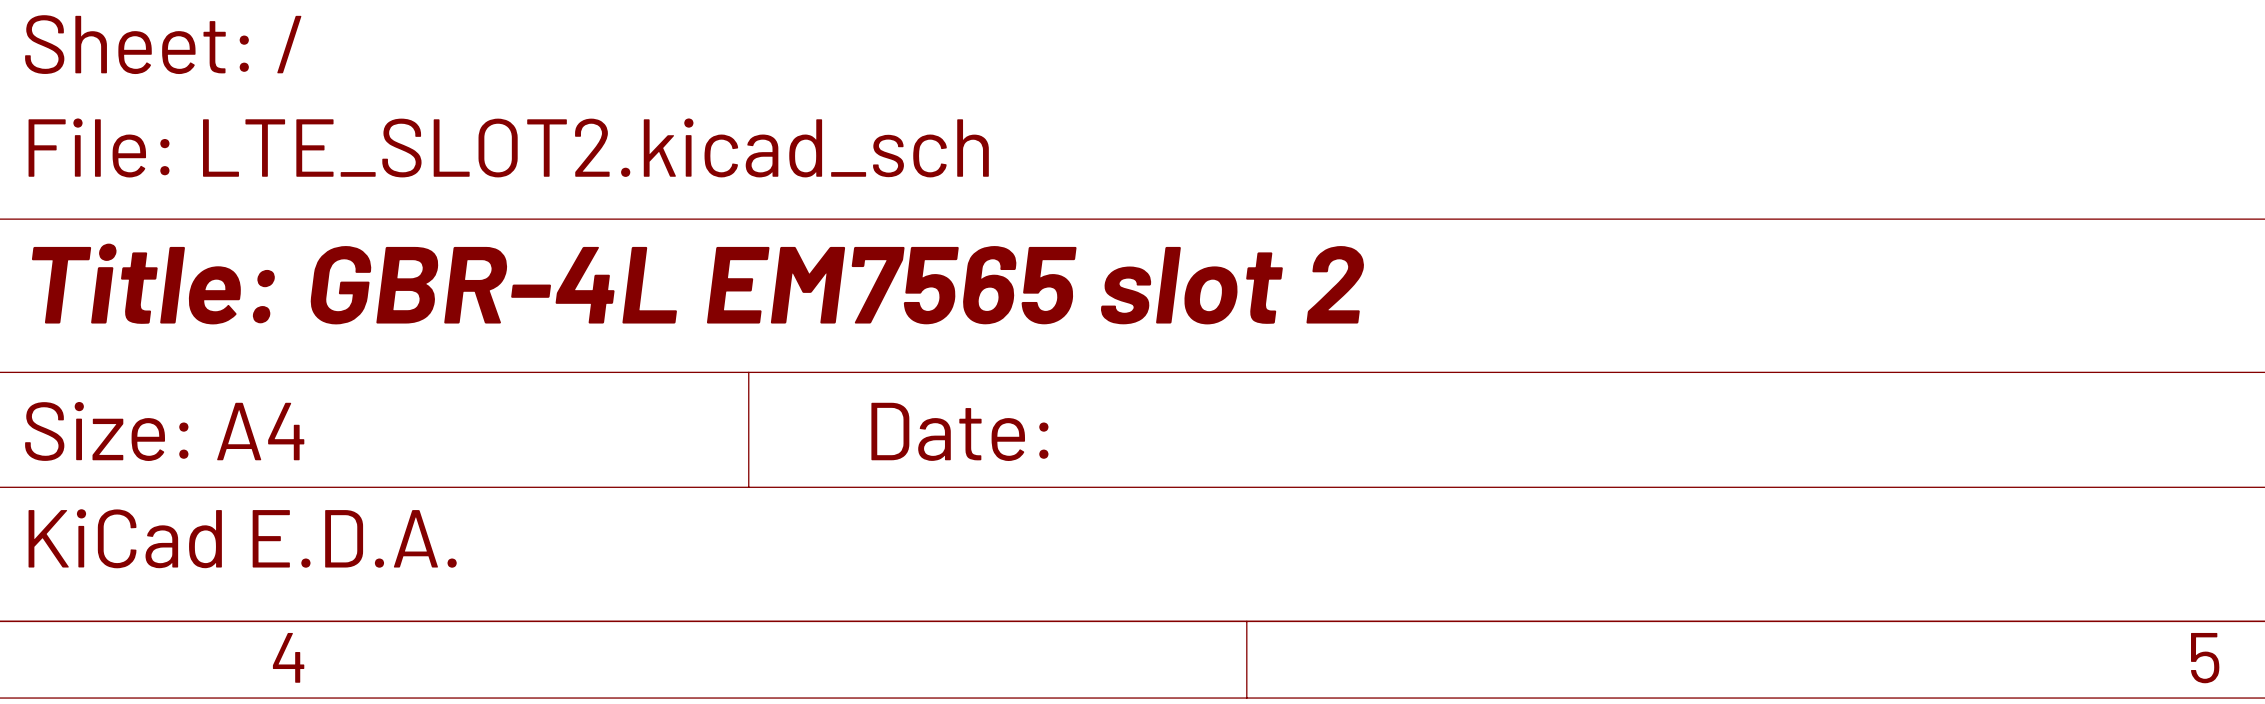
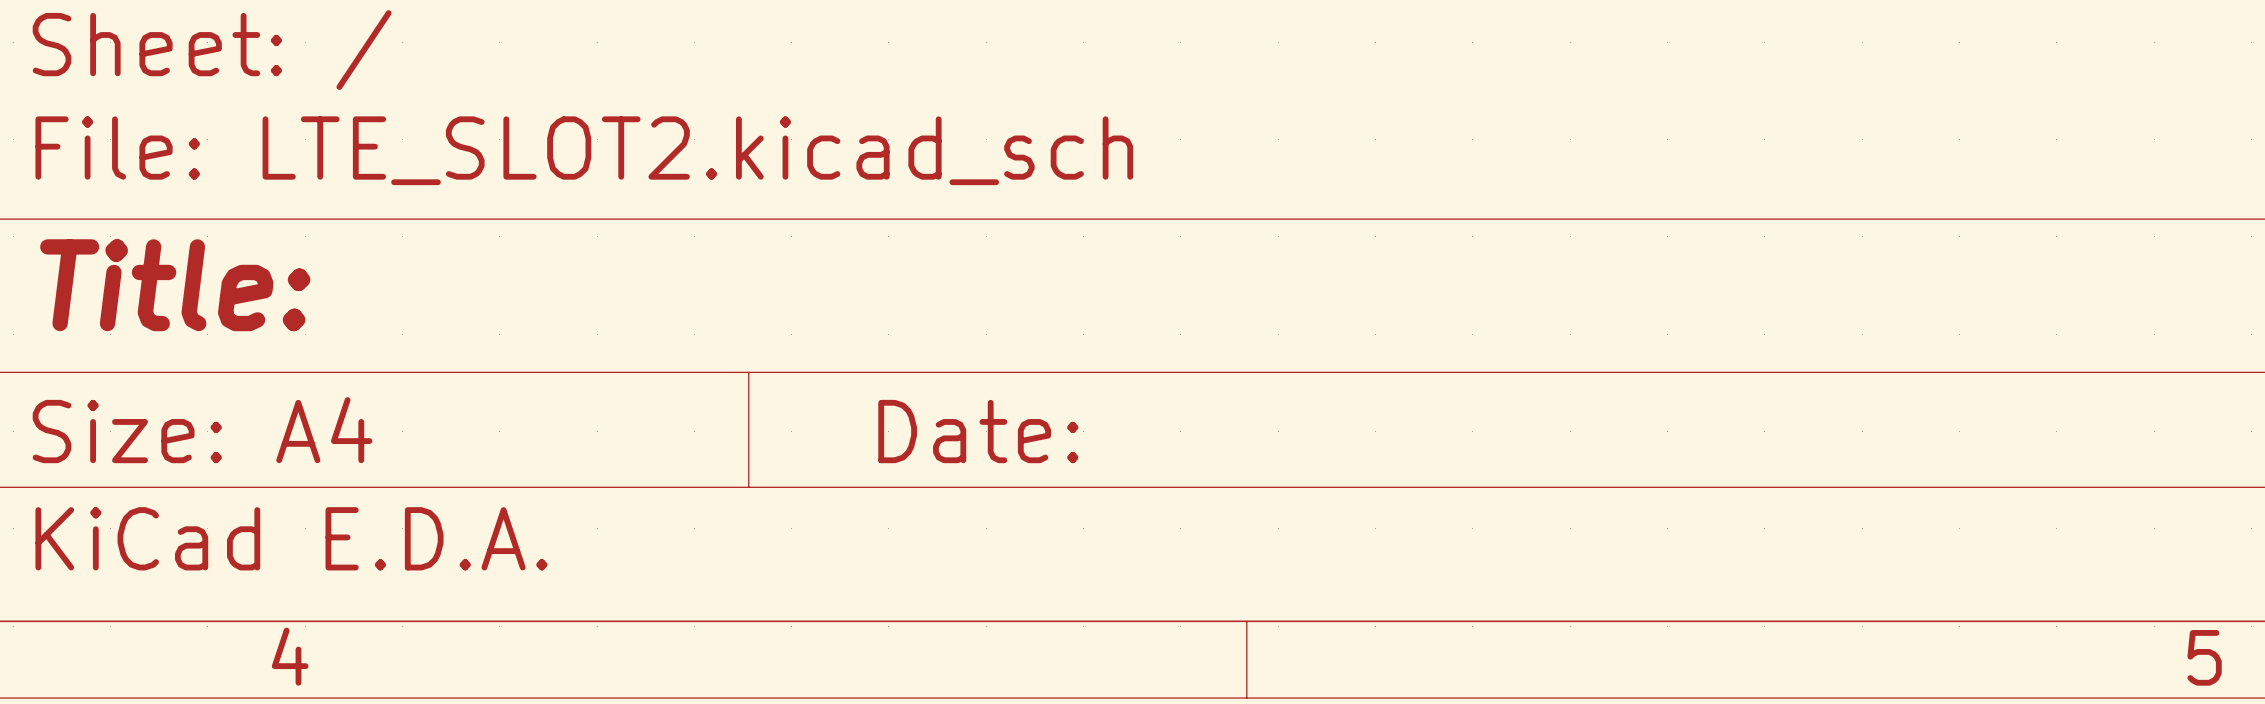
title block: Title: GBR-4L EM7565 slot 2 (698, 284) -> Title: (175, 285)

